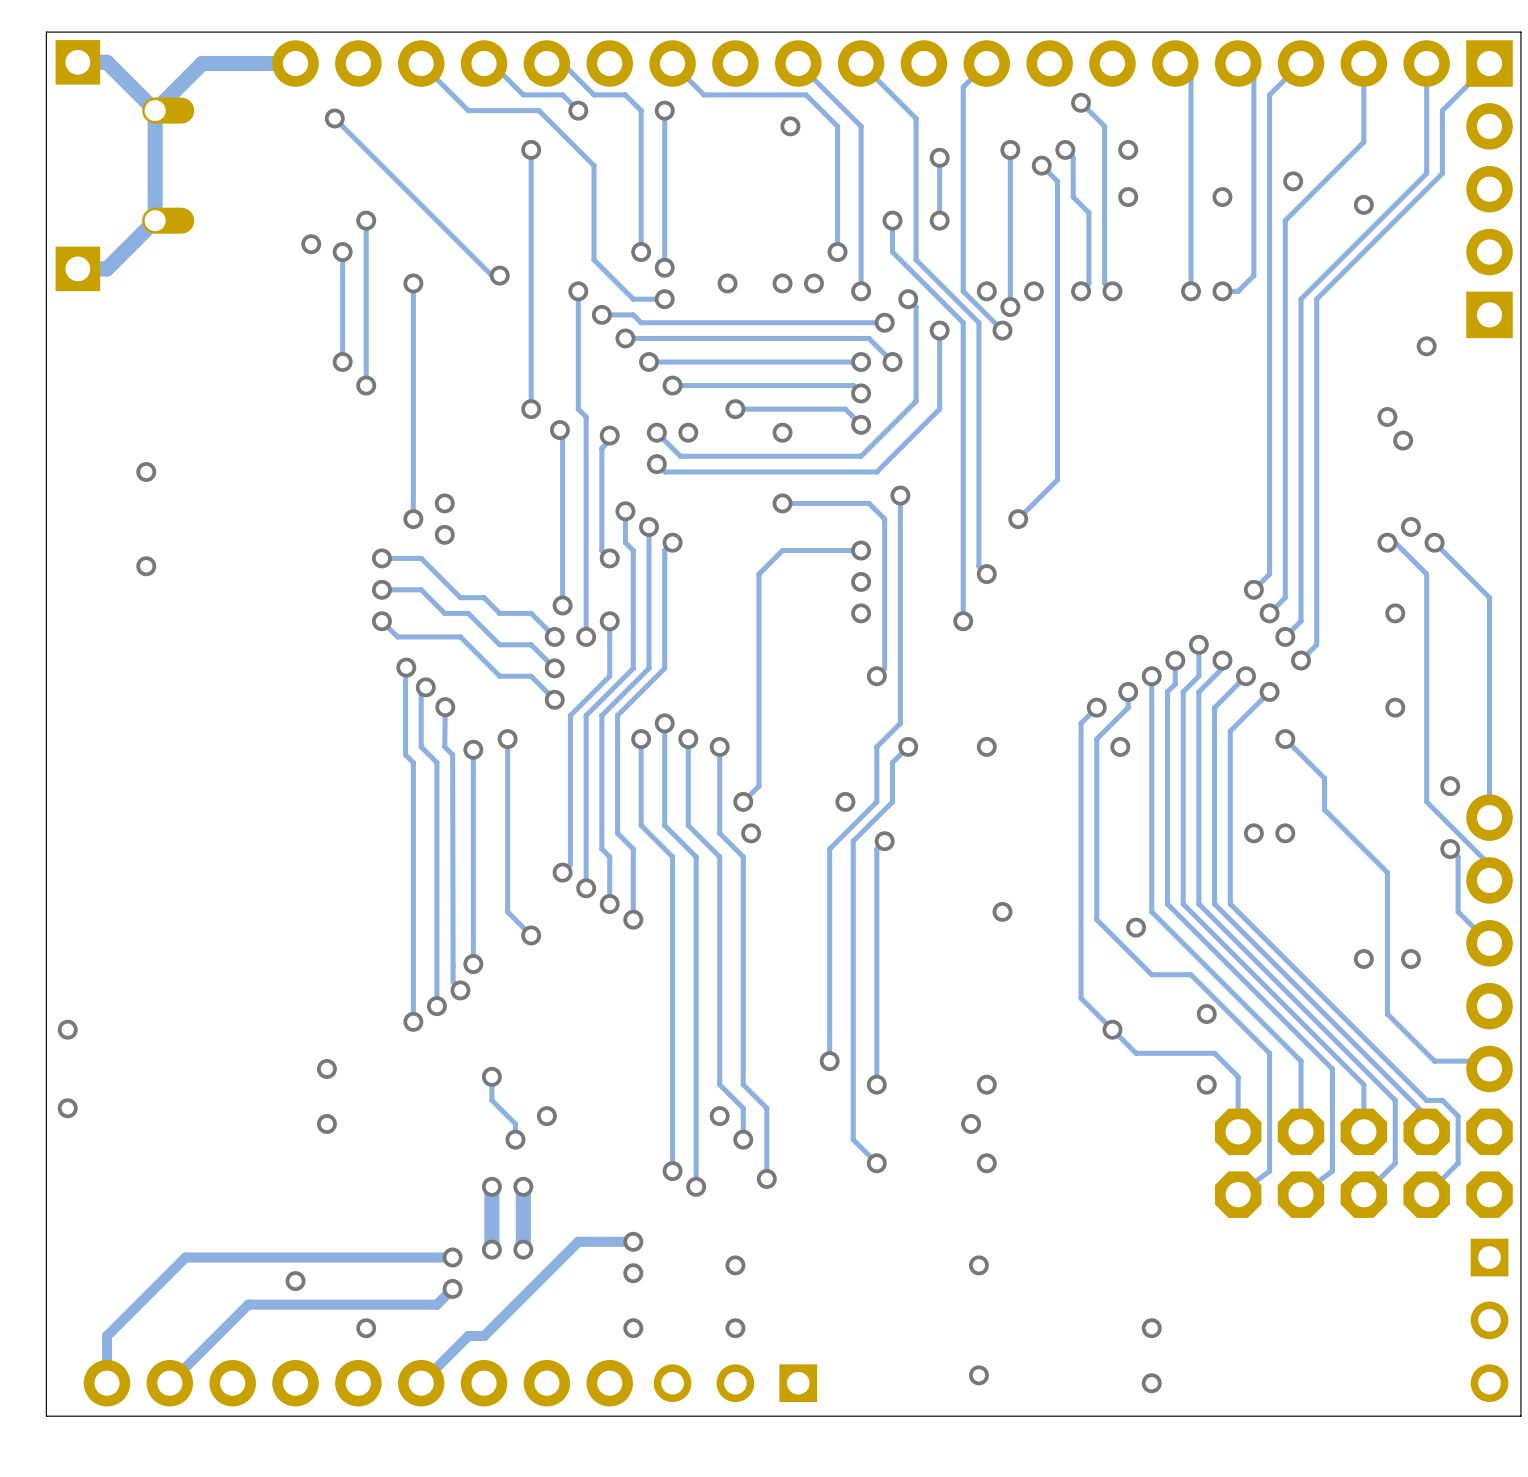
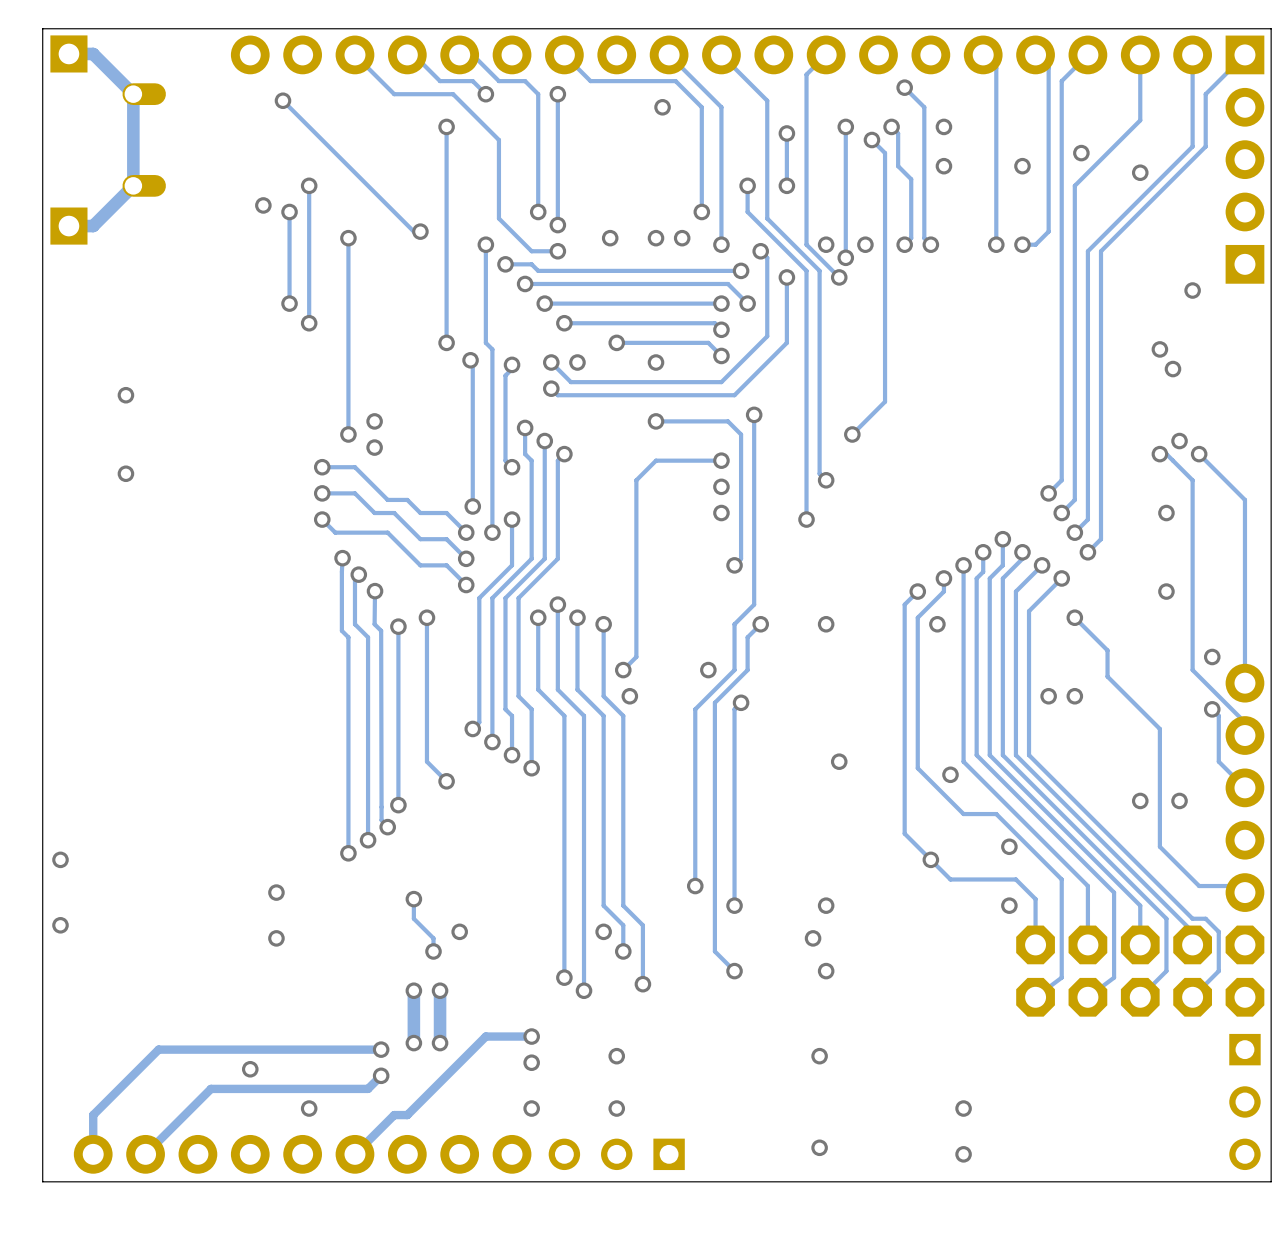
track: (295, 63) (202, 63) (155, 110) -> none

